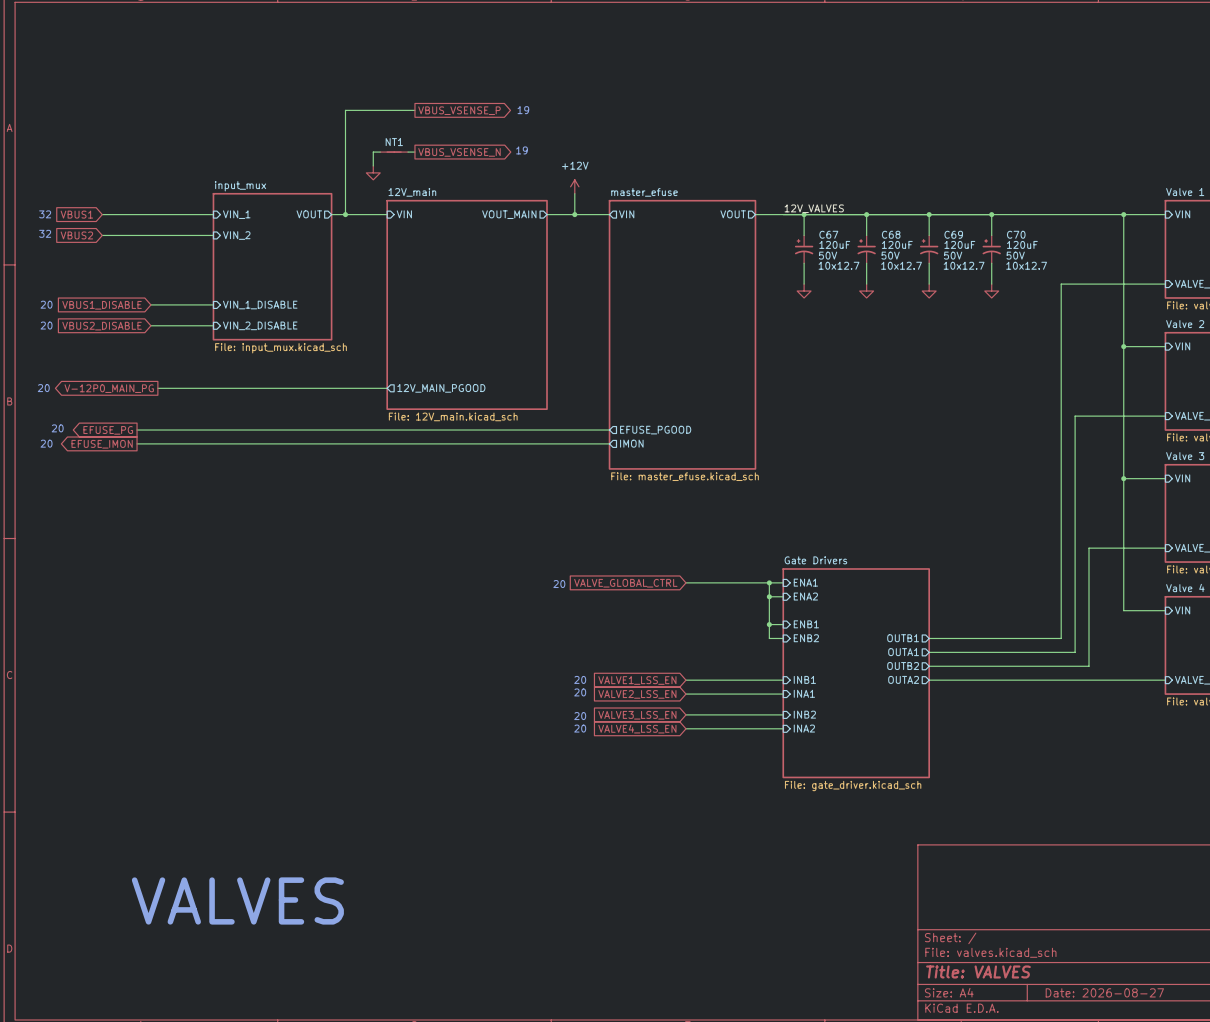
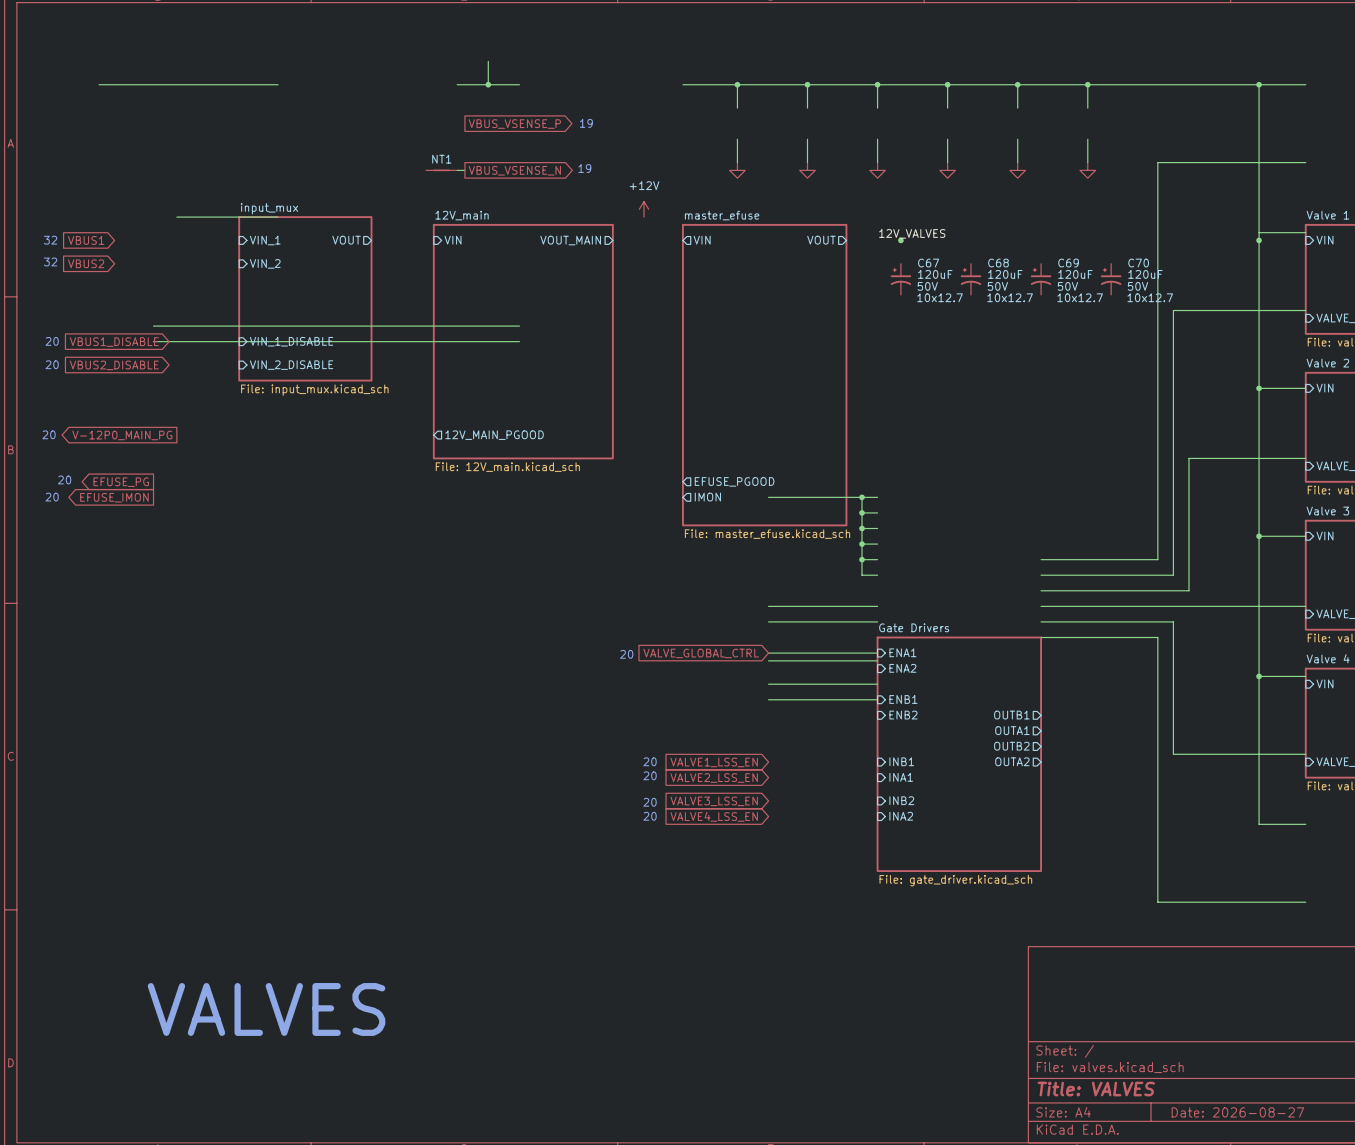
wire: none -> (488, 61) (488, 84)
wire: none -> (99, 84) (278, 84)
wire: none -> (457, 84) (519, 84)
junction: none -> (488, 84)
wire: none -> (682, 84) (1305, 84)
wire: none -> (737, 84) (737, 108)
junction: none -> (737, 84)
wire: none -> (807, 84) (807, 108)
junction: none -> (807, 84)
wire: none -> (877, 84) (877, 108)
junction: none -> (877, 84)
wire: none -> (947, 84) (947, 108)
junction: none -> (947, 84)
wire: none -> (1017, 84) (1017, 108)
junction: none -> (1017, 84)
wire: none -> (1087, 84) (1087, 108)
junction: none -> (1087, 84)
wire: none -> (1259, 84) (1259, 240)
junction: none -> (1259, 84)
wire: (414, 110) (345, 110) (345, 214) -> none
wire: none -> (807, 139) (807, 162)
wire: none -> (1305, 162) (1157, 162) (1157, 559) (1041, 559)
wire: (380, 152) (373, 152) (373, 165) -> none
power symbol: none -> (737, 170)
power symbol: none -> (807, 170)
power symbol: none -> (877, 170)
power symbol: none -> (947, 170)
power symbol: none -> (1017, 170)
power symbol: none -> (1087, 170)
power symbol: (373, 172) -> none
wire: none -> (176, 217) (278, 217)
wire: (574, 193) (574, 214) -> (737, 139) (737, 162)
wire: none -> (1259, 232) (1305, 232)
wire: (102, 214) (213, 214) -> none
wire: (331, 214) (387, 214) -> none
junction: (345, 214) -> none
wire: (547, 214) (609, 214) -> none
junction: (574, 214) -> none
wire: (755, 214) (1165, 214) -> none
wire: (804, 214) (804, 235) -> (877, 139) (877, 162)
wire: (866, 214) (866, 235) -> (947, 139) (947, 162)
junction: (866, 214) -> none
wire: (929, 214) (929, 235) -> (1017, 139) (1017, 162)
junction: (929, 214) -> none
wire: (991, 214) (991, 235) -> (1087, 139) (1087, 162)
junction: (991, 214) -> none
wire: (102, 235) (213, 235) -> none
wire: (804, 263) (804, 284) -> none
wire: (866, 263) (866, 284) -> none
wire: (929, 263) (929, 284) -> none
wire: (991, 263) (991, 284) -> none
wire: none -> (1305, 310) (1173, 310) (1173, 575) (1041, 575)
wire: (1165, 284) (1061, 284) (1061, 409) -> (1305, 458) (1188, 458)
wire: none -> (153, 326) (519, 326)
power symbol: (804, 291) -> none
power symbol: (866, 291) -> none
power symbol: (929, 291) -> none
power symbol: (991, 291) -> none
wire: none -> (153, 341) (169, 341)
wire: none -> (239, 341) (519, 341)
wire: (150, 325) (213, 325) -> none
wire: (157, 388) (387, 388) -> none
wire: (1165, 416) (1075, 416) (1075, 652) (929, 652) -> none
wire: (137, 430) (609, 430) -> none
wire: (137, 443) (609, 443) -> none
wire: none -> (768, 497) (877, 497)
wire: none -> (862, 497) (862, 575) (877, 575)
junction: none -> (862, 497)
wire: none -> (862, 512) (877, 512)
junction: none -> (862, 512)
junction: none -> (862, 528)
wire: none -> (862, 544) (877, 544)
junction: none -> (862, 544)
wire: none -> (862, 559) (877, 559)
junction: none -> (862, 559)
wire: (1061, 527) (1061, 638) (929, 638) -> (1188, 590) (1041, 590)
wire: none -> (768, 606) (877, 606)
wire: none -> (1041, 606) (1305, 606)
wire: (1165, 548) (1089, 548) (1089, 666) (929, 666) -> none
wire: none -> (1041, 621) (1173, 621) (1173, 754) (1305, 754)
wire: none -> (1041, 637) (1157, 637) (1157, 902) (1305, 902)
wire: (769, 582) (769, 638) (783, 638) -> none
junction: (769, 582) -> none
wire: (769, 596) (783, 596) -> (862, 528) (877, 528)
junction: (769, 596) -> none
wire: none -> (1259, 676) (1305, 676)
junction: none -> (1259, 676)
wire: (1123, 610) (1165, 610) -> (1259, 684) (1259, 824) (1305, 824)
wire: none -> (768, 699) (862, 699)
junction: (769, 624) -> none
wire: (685, 680) (783, 680) -> (768, 621) (877, 621)
wire: (929, 680) (1165, 680) -> none
wire: (685, 694) (783, 694) -> (768, 684) (877, 684)
wire: (685, 714) (783, 714) -> (768, 660) (877, 660)
wire: (685, 728) (783, 728) -> none

